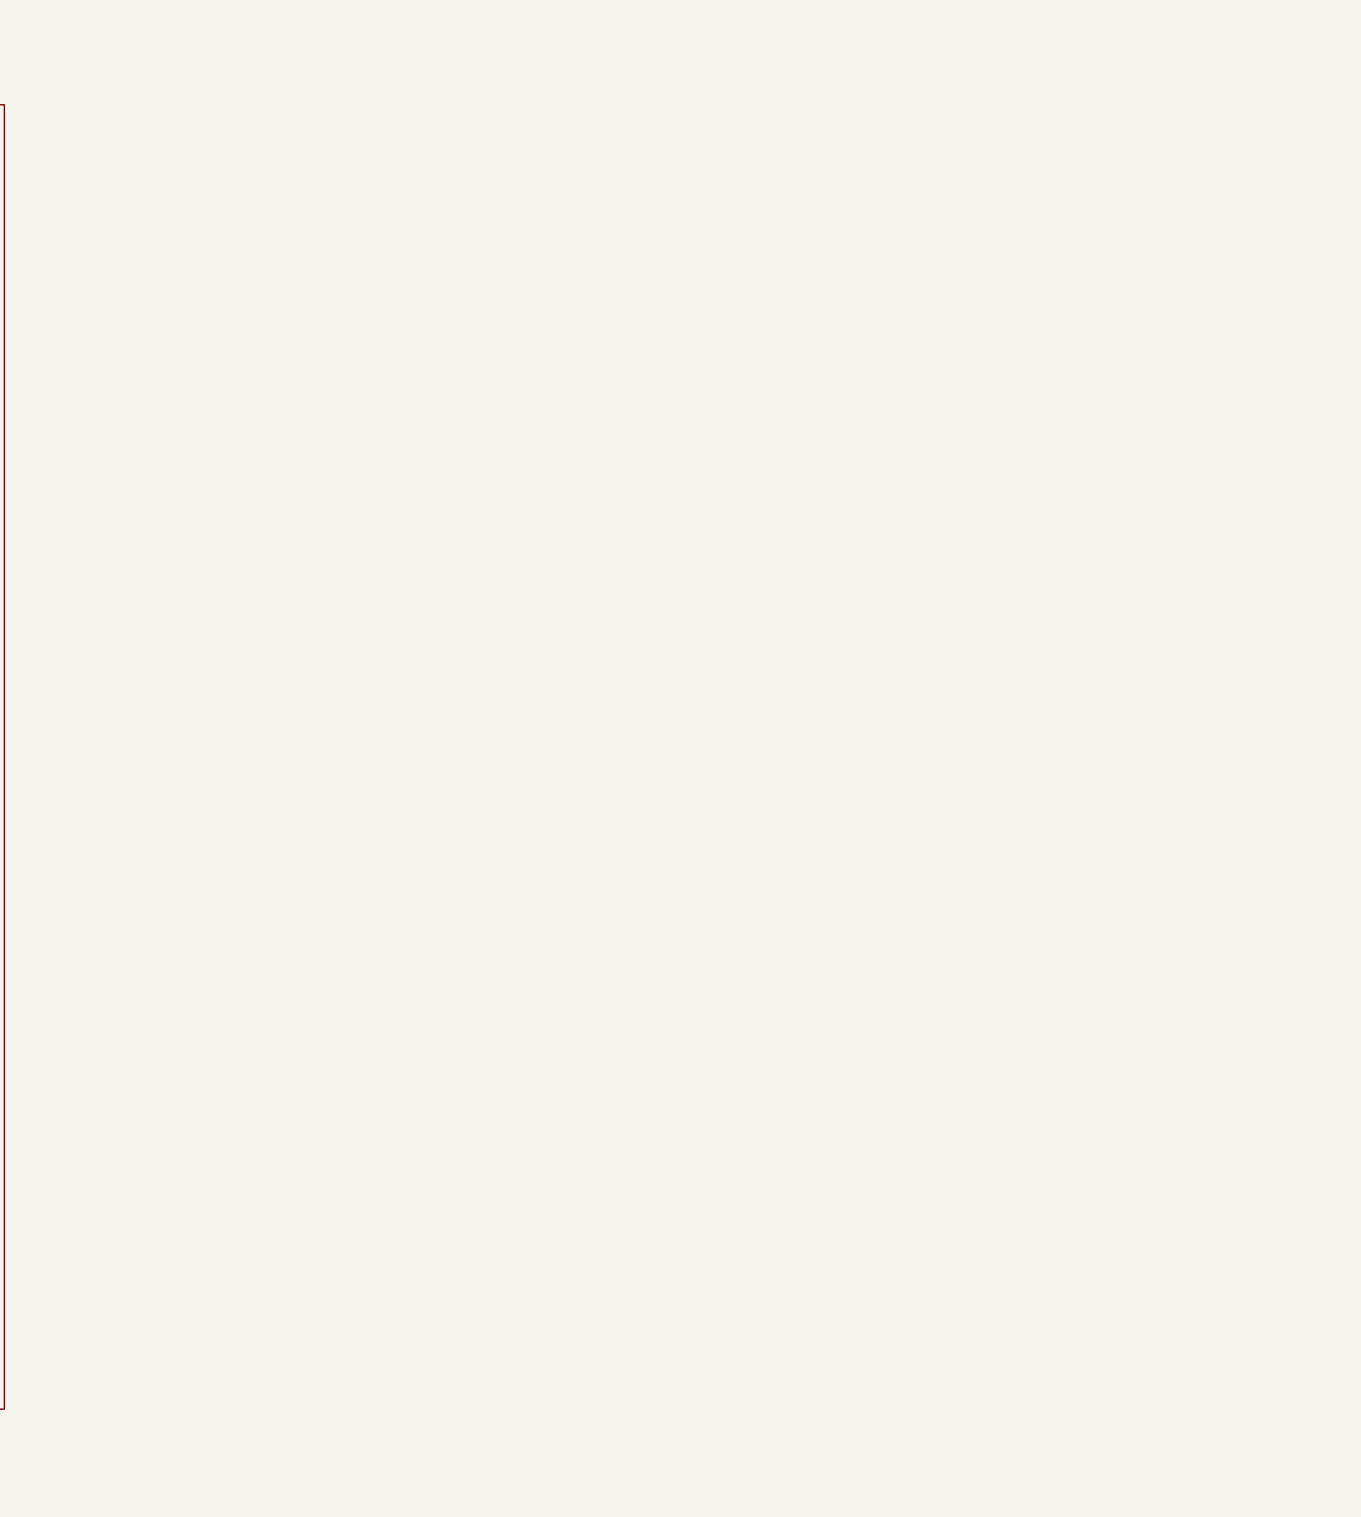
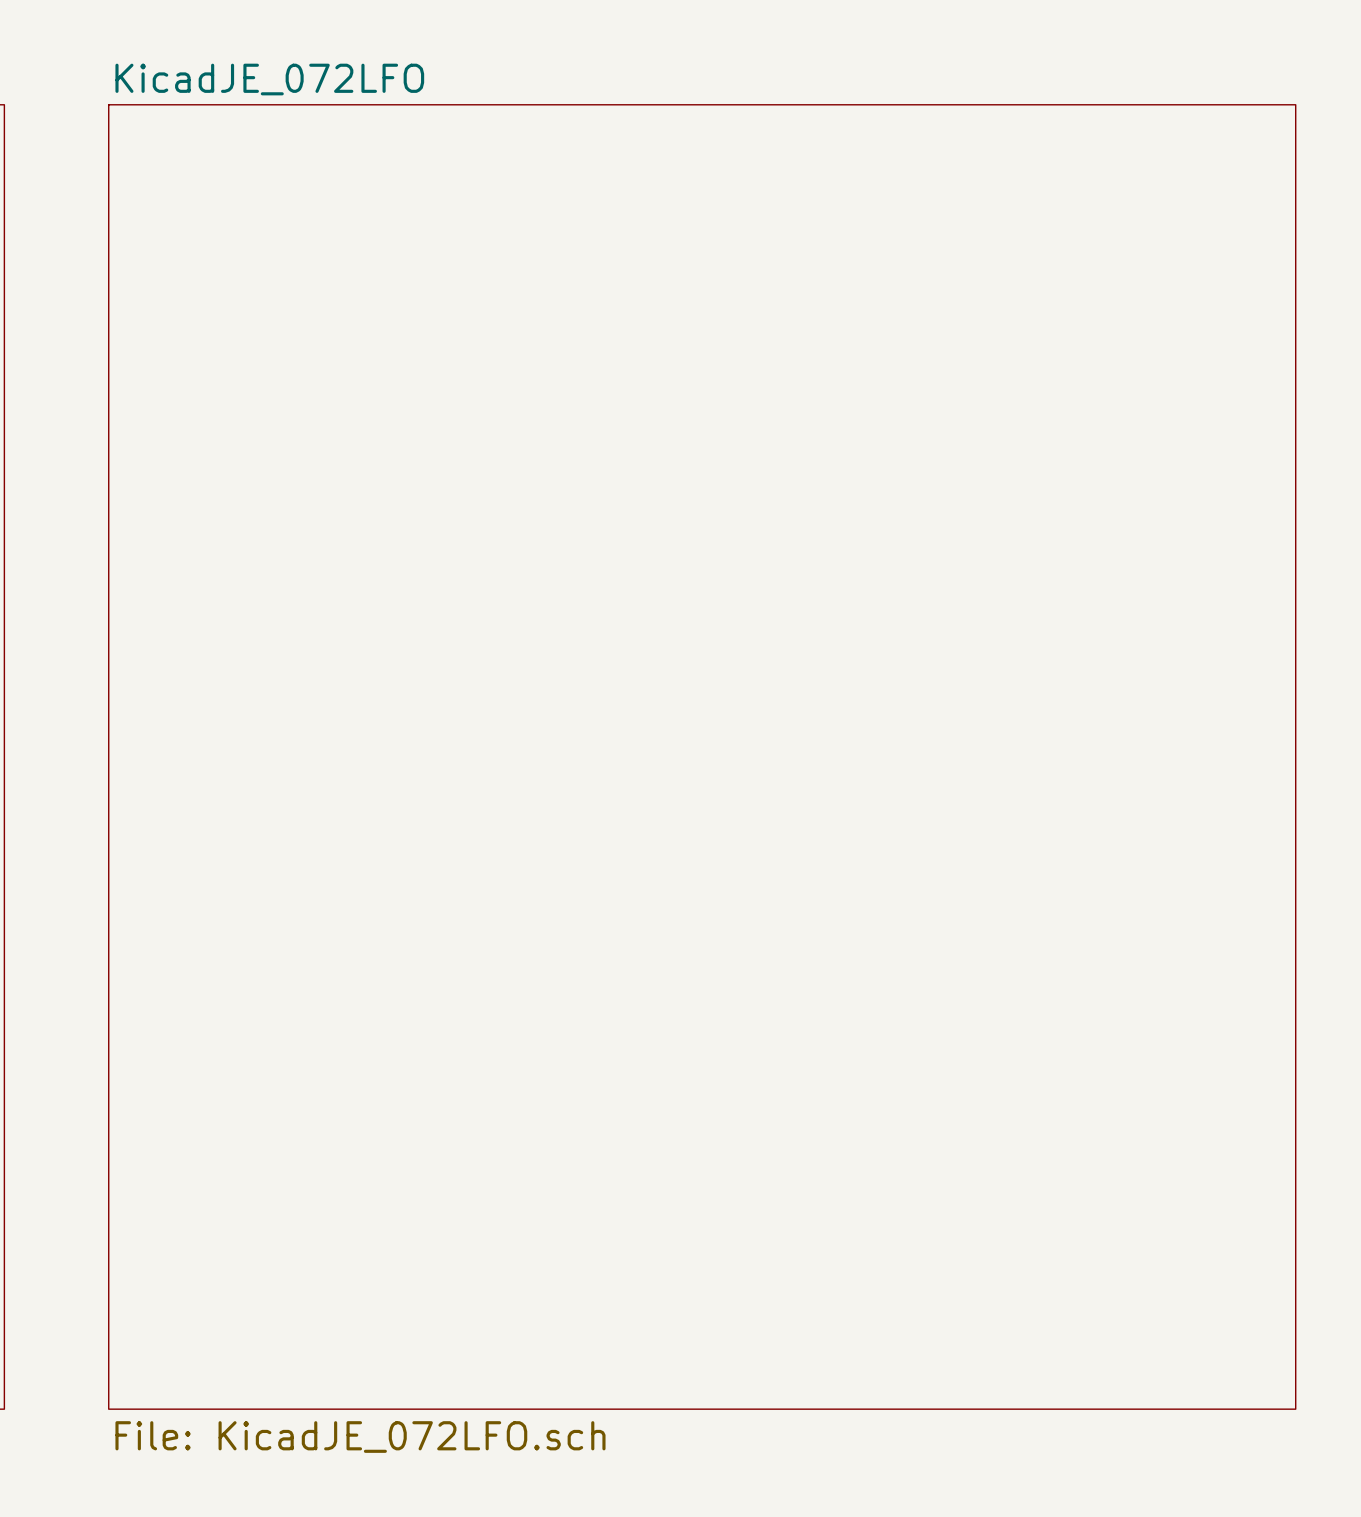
sheet KicadJE_072LFO: none -> File: KicadJE_072LFO.sch (702, 756)

